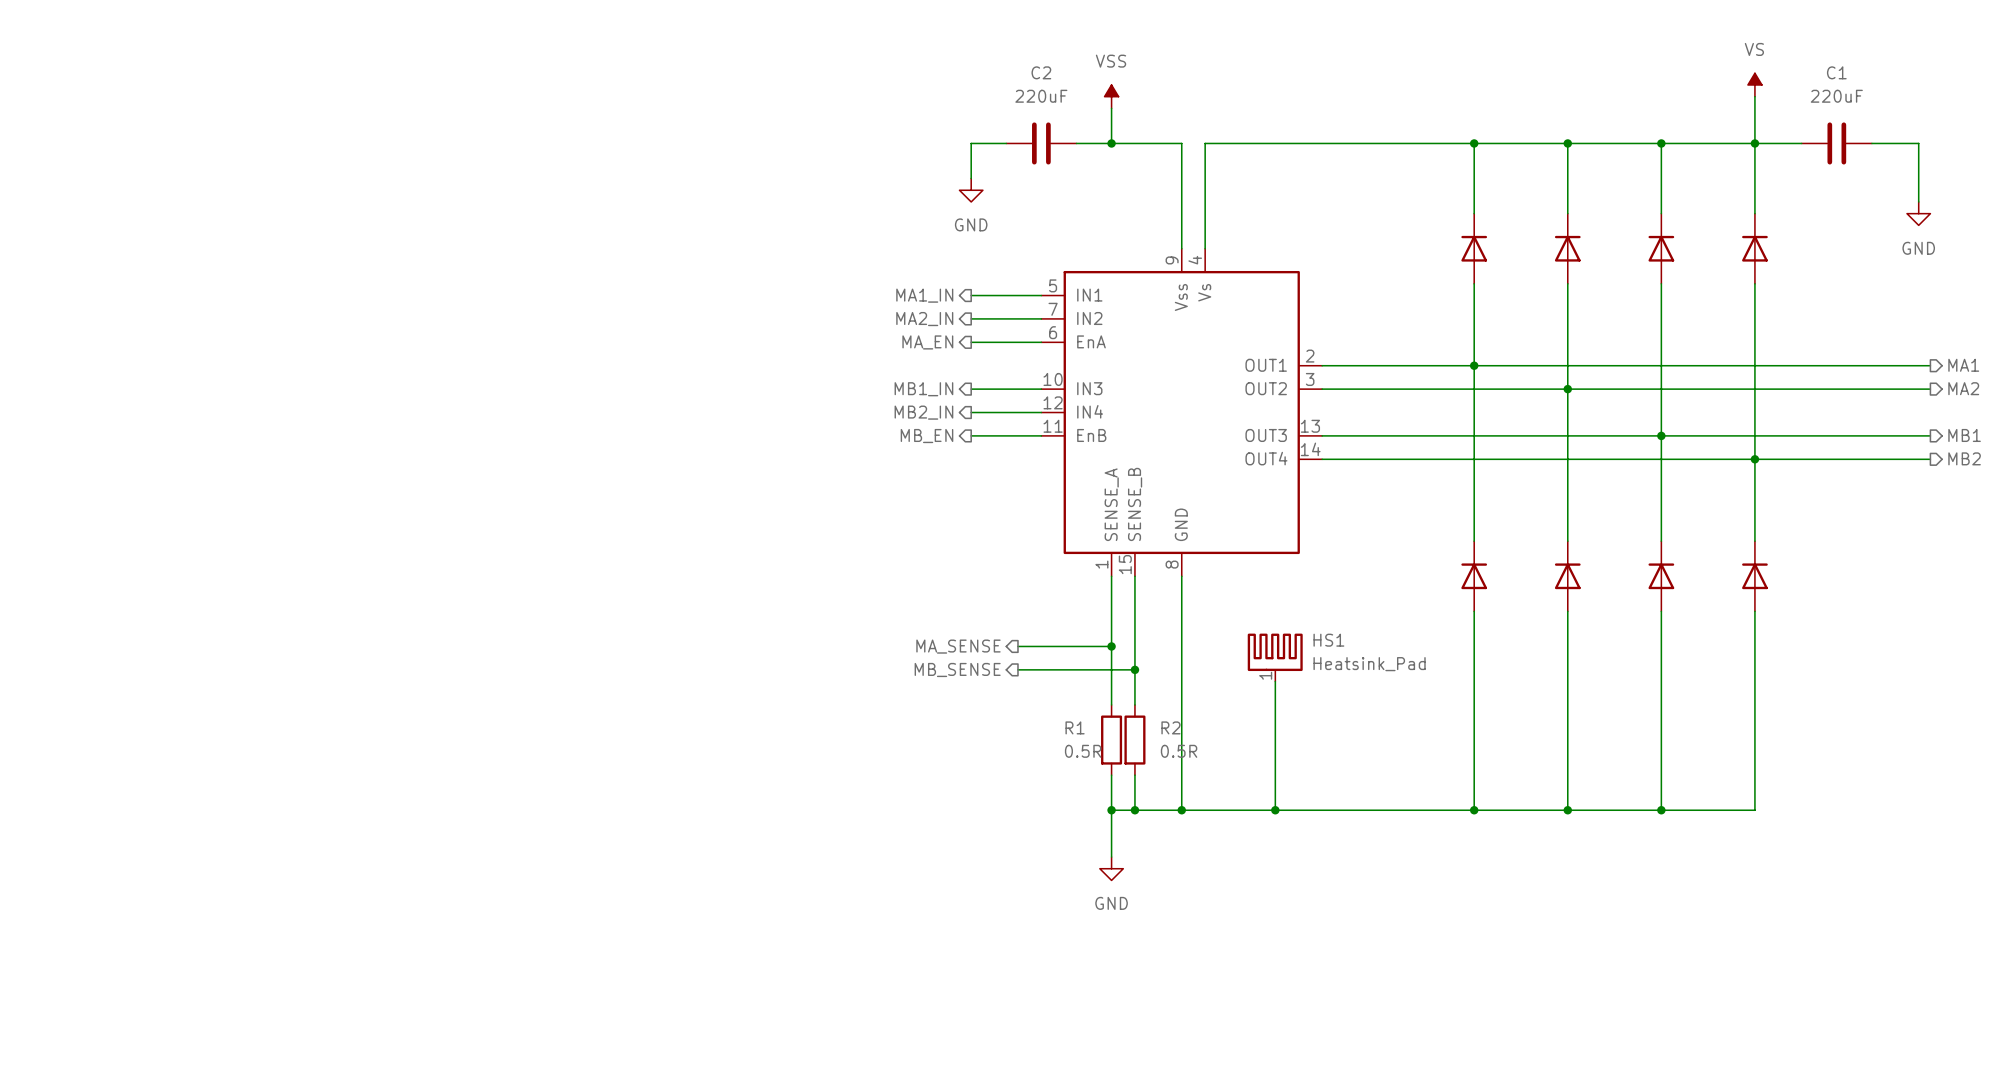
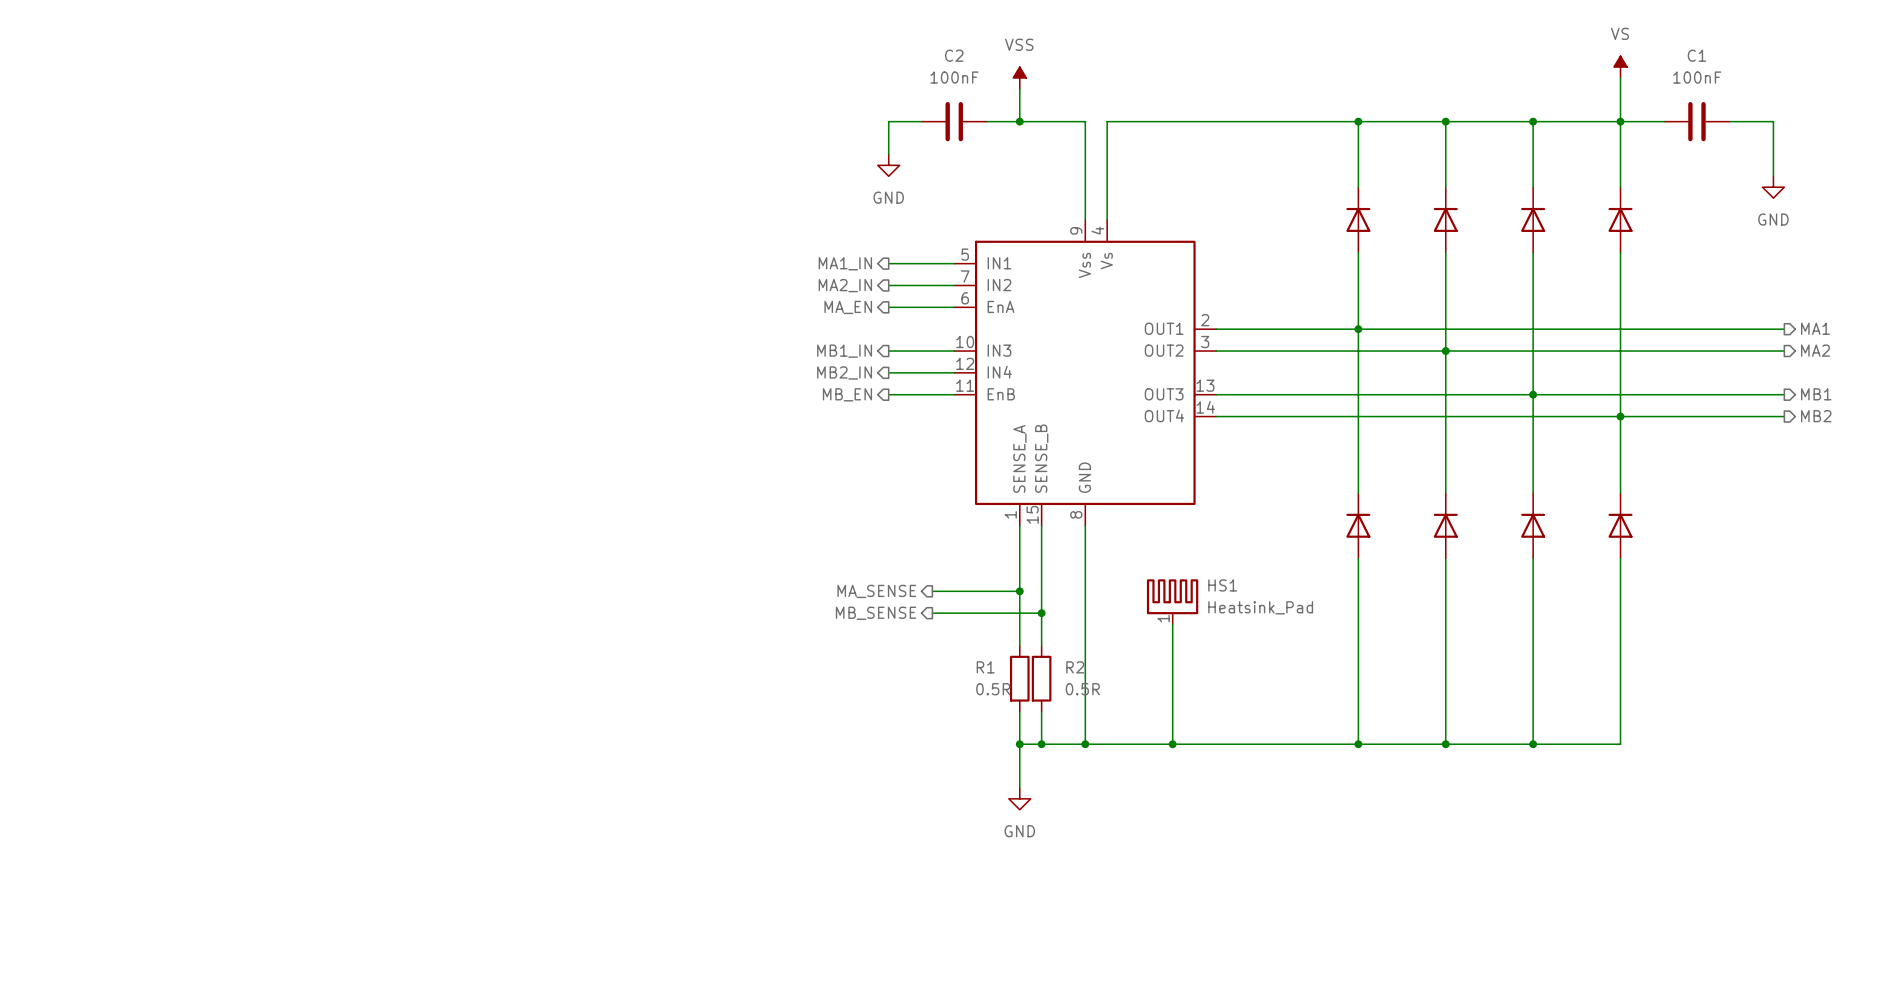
C2 value: 220uF (1041, 96) -> 100nF (954, 77)
C1 value: 220uF (1836, 96) -> 100nF (1697, 77)

